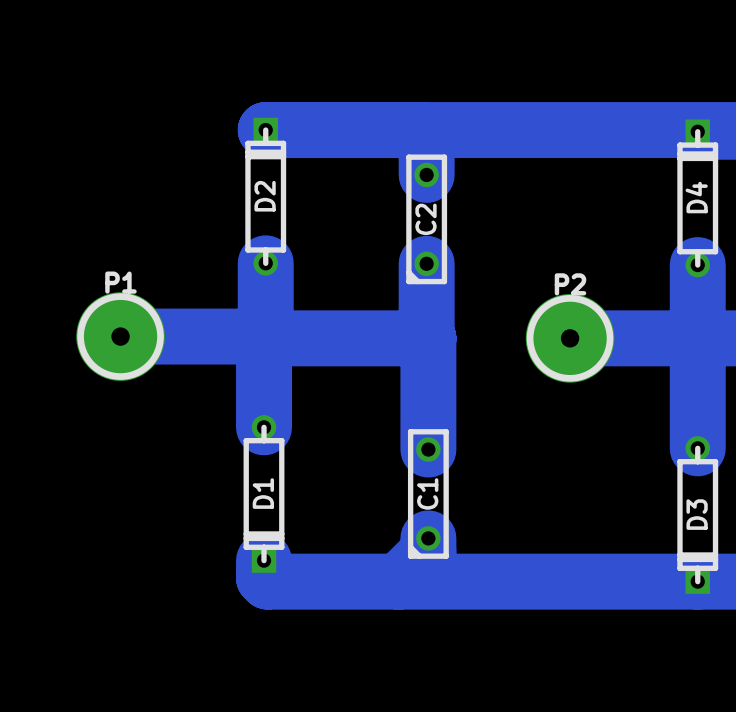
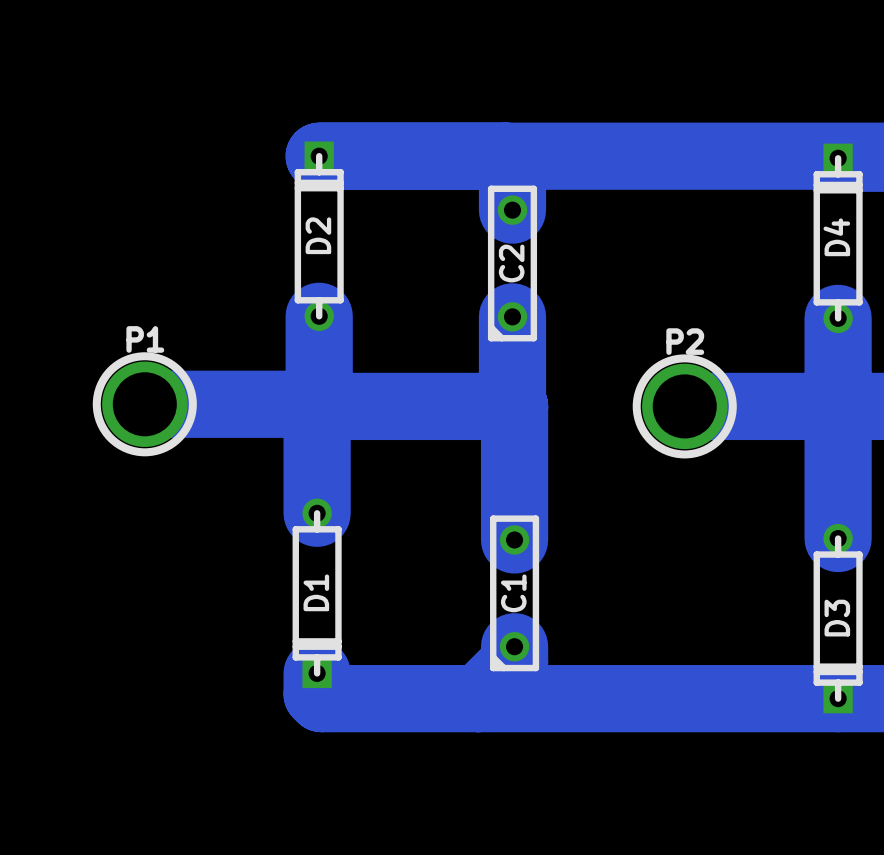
P1 footprint: [76, 292, 165, 381] -> [92, 352, 197, 457]
P2 footprint: [525, 294, 615, 383] -> [632, 354, 737, 459]

